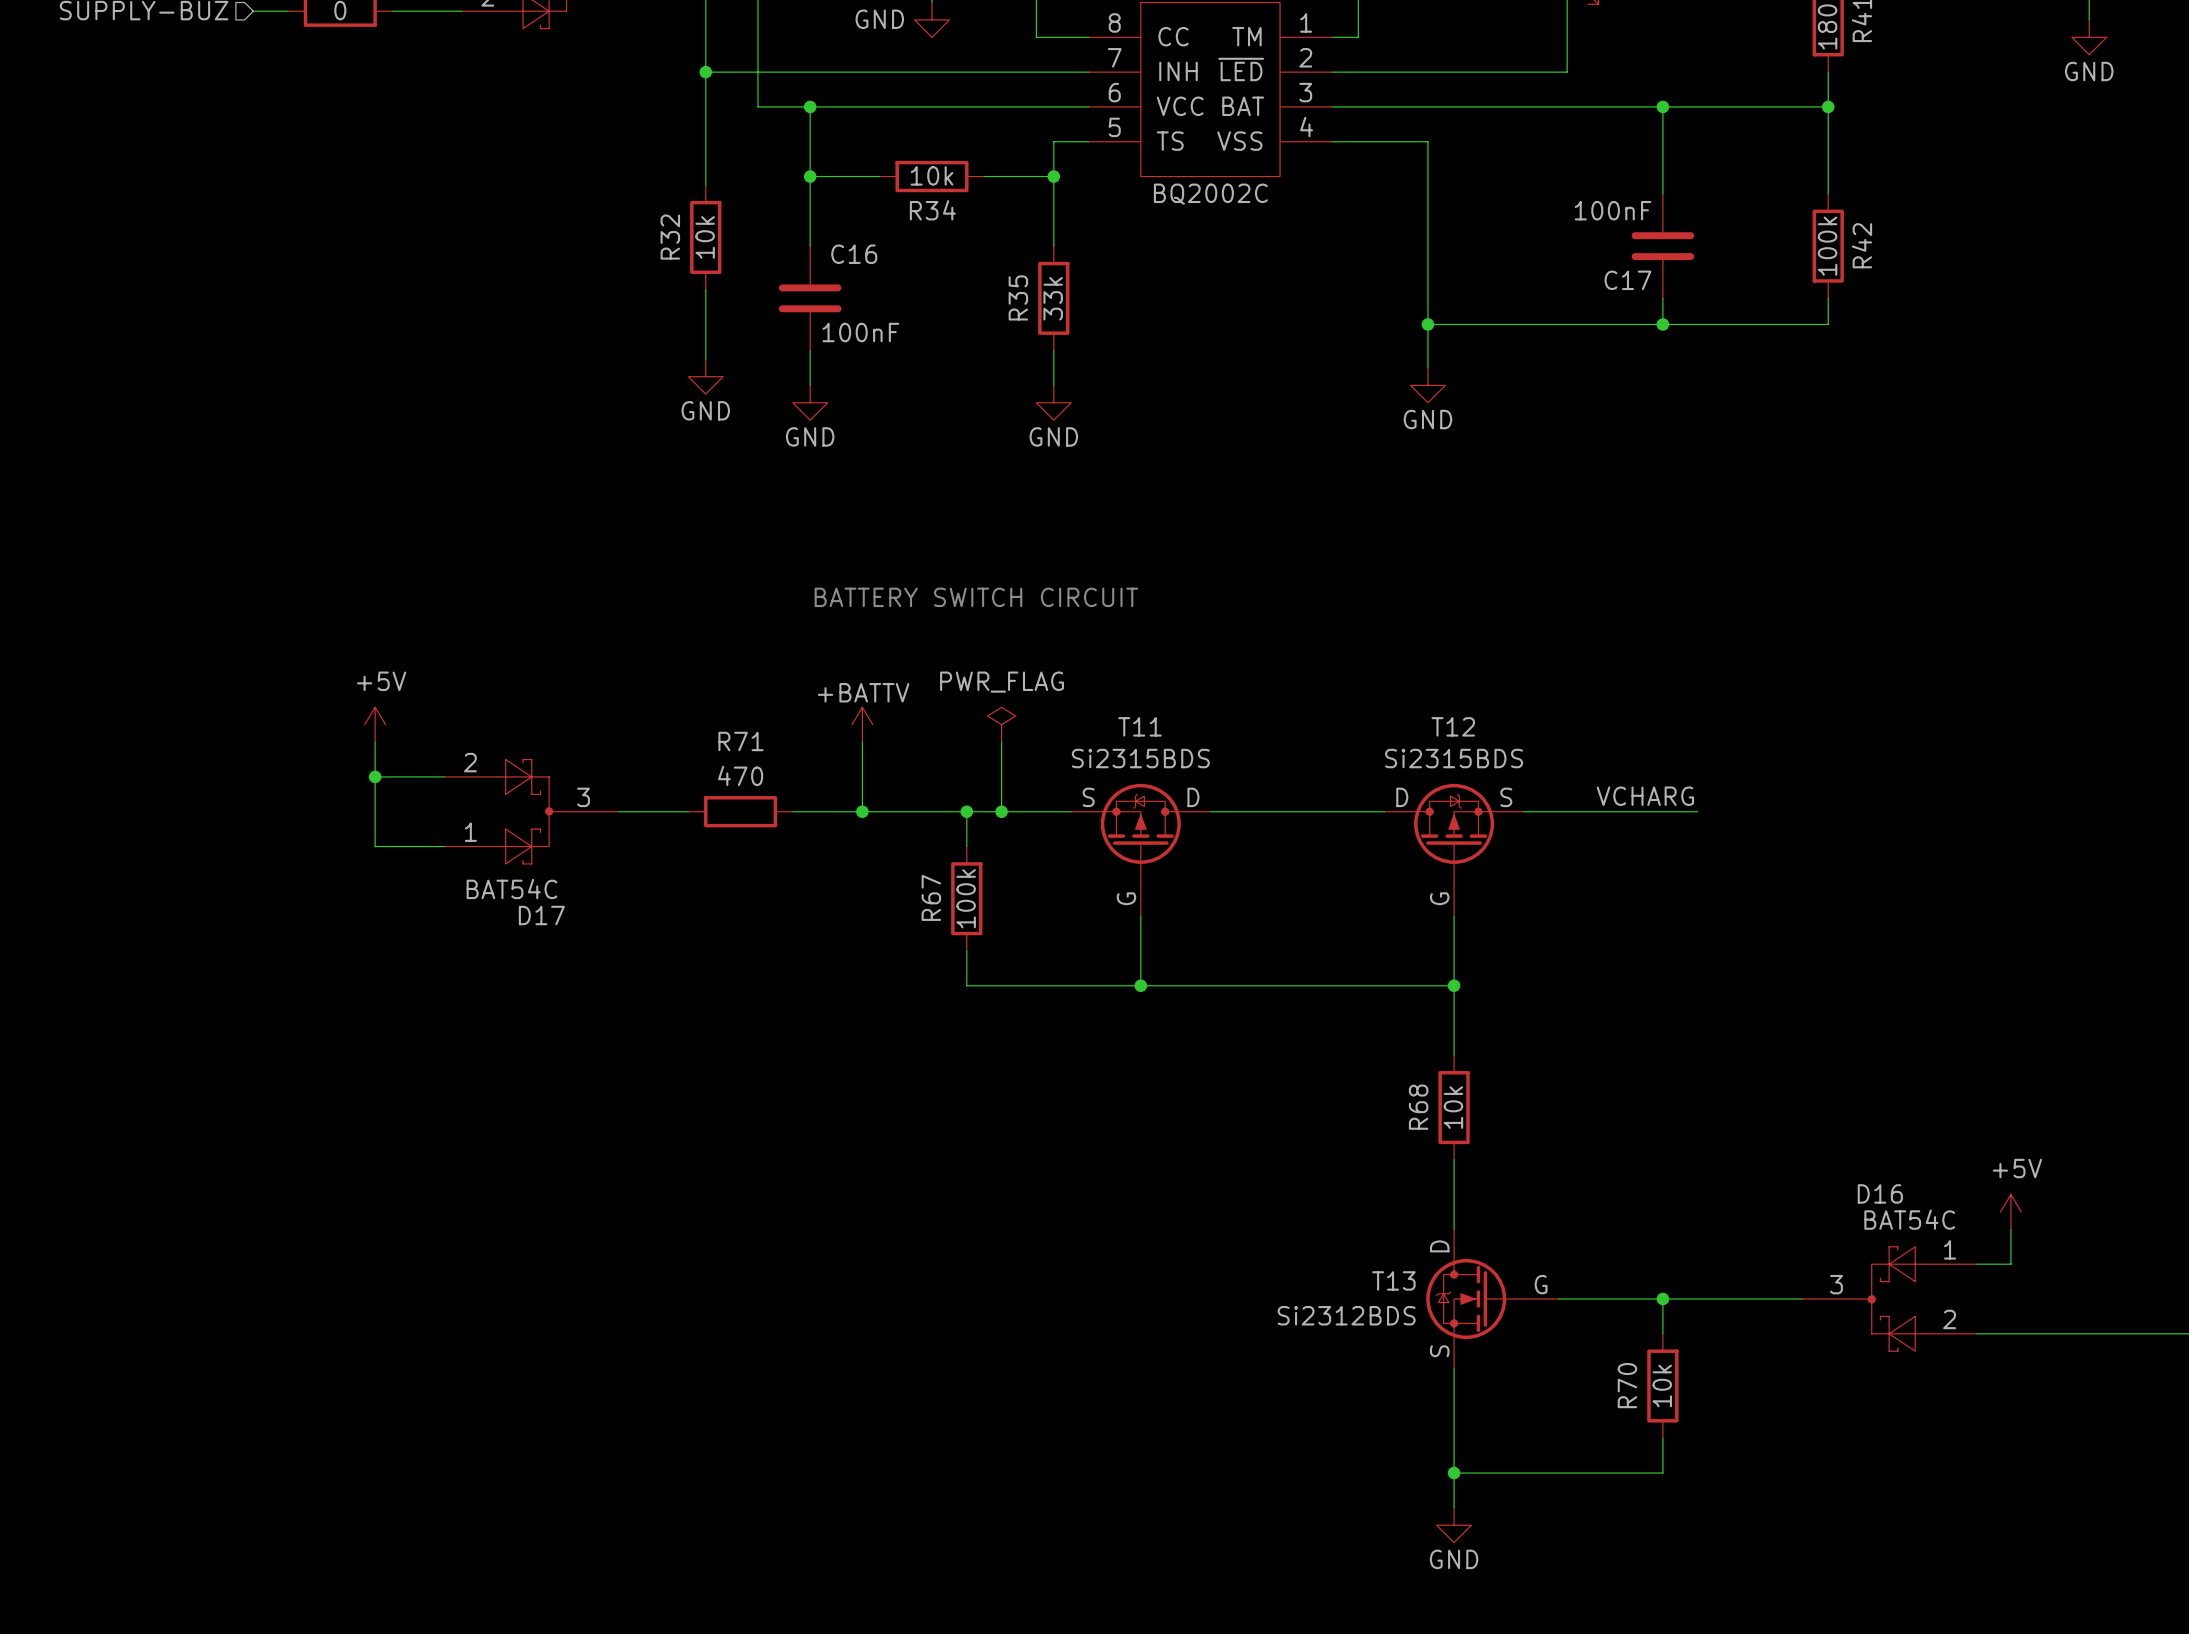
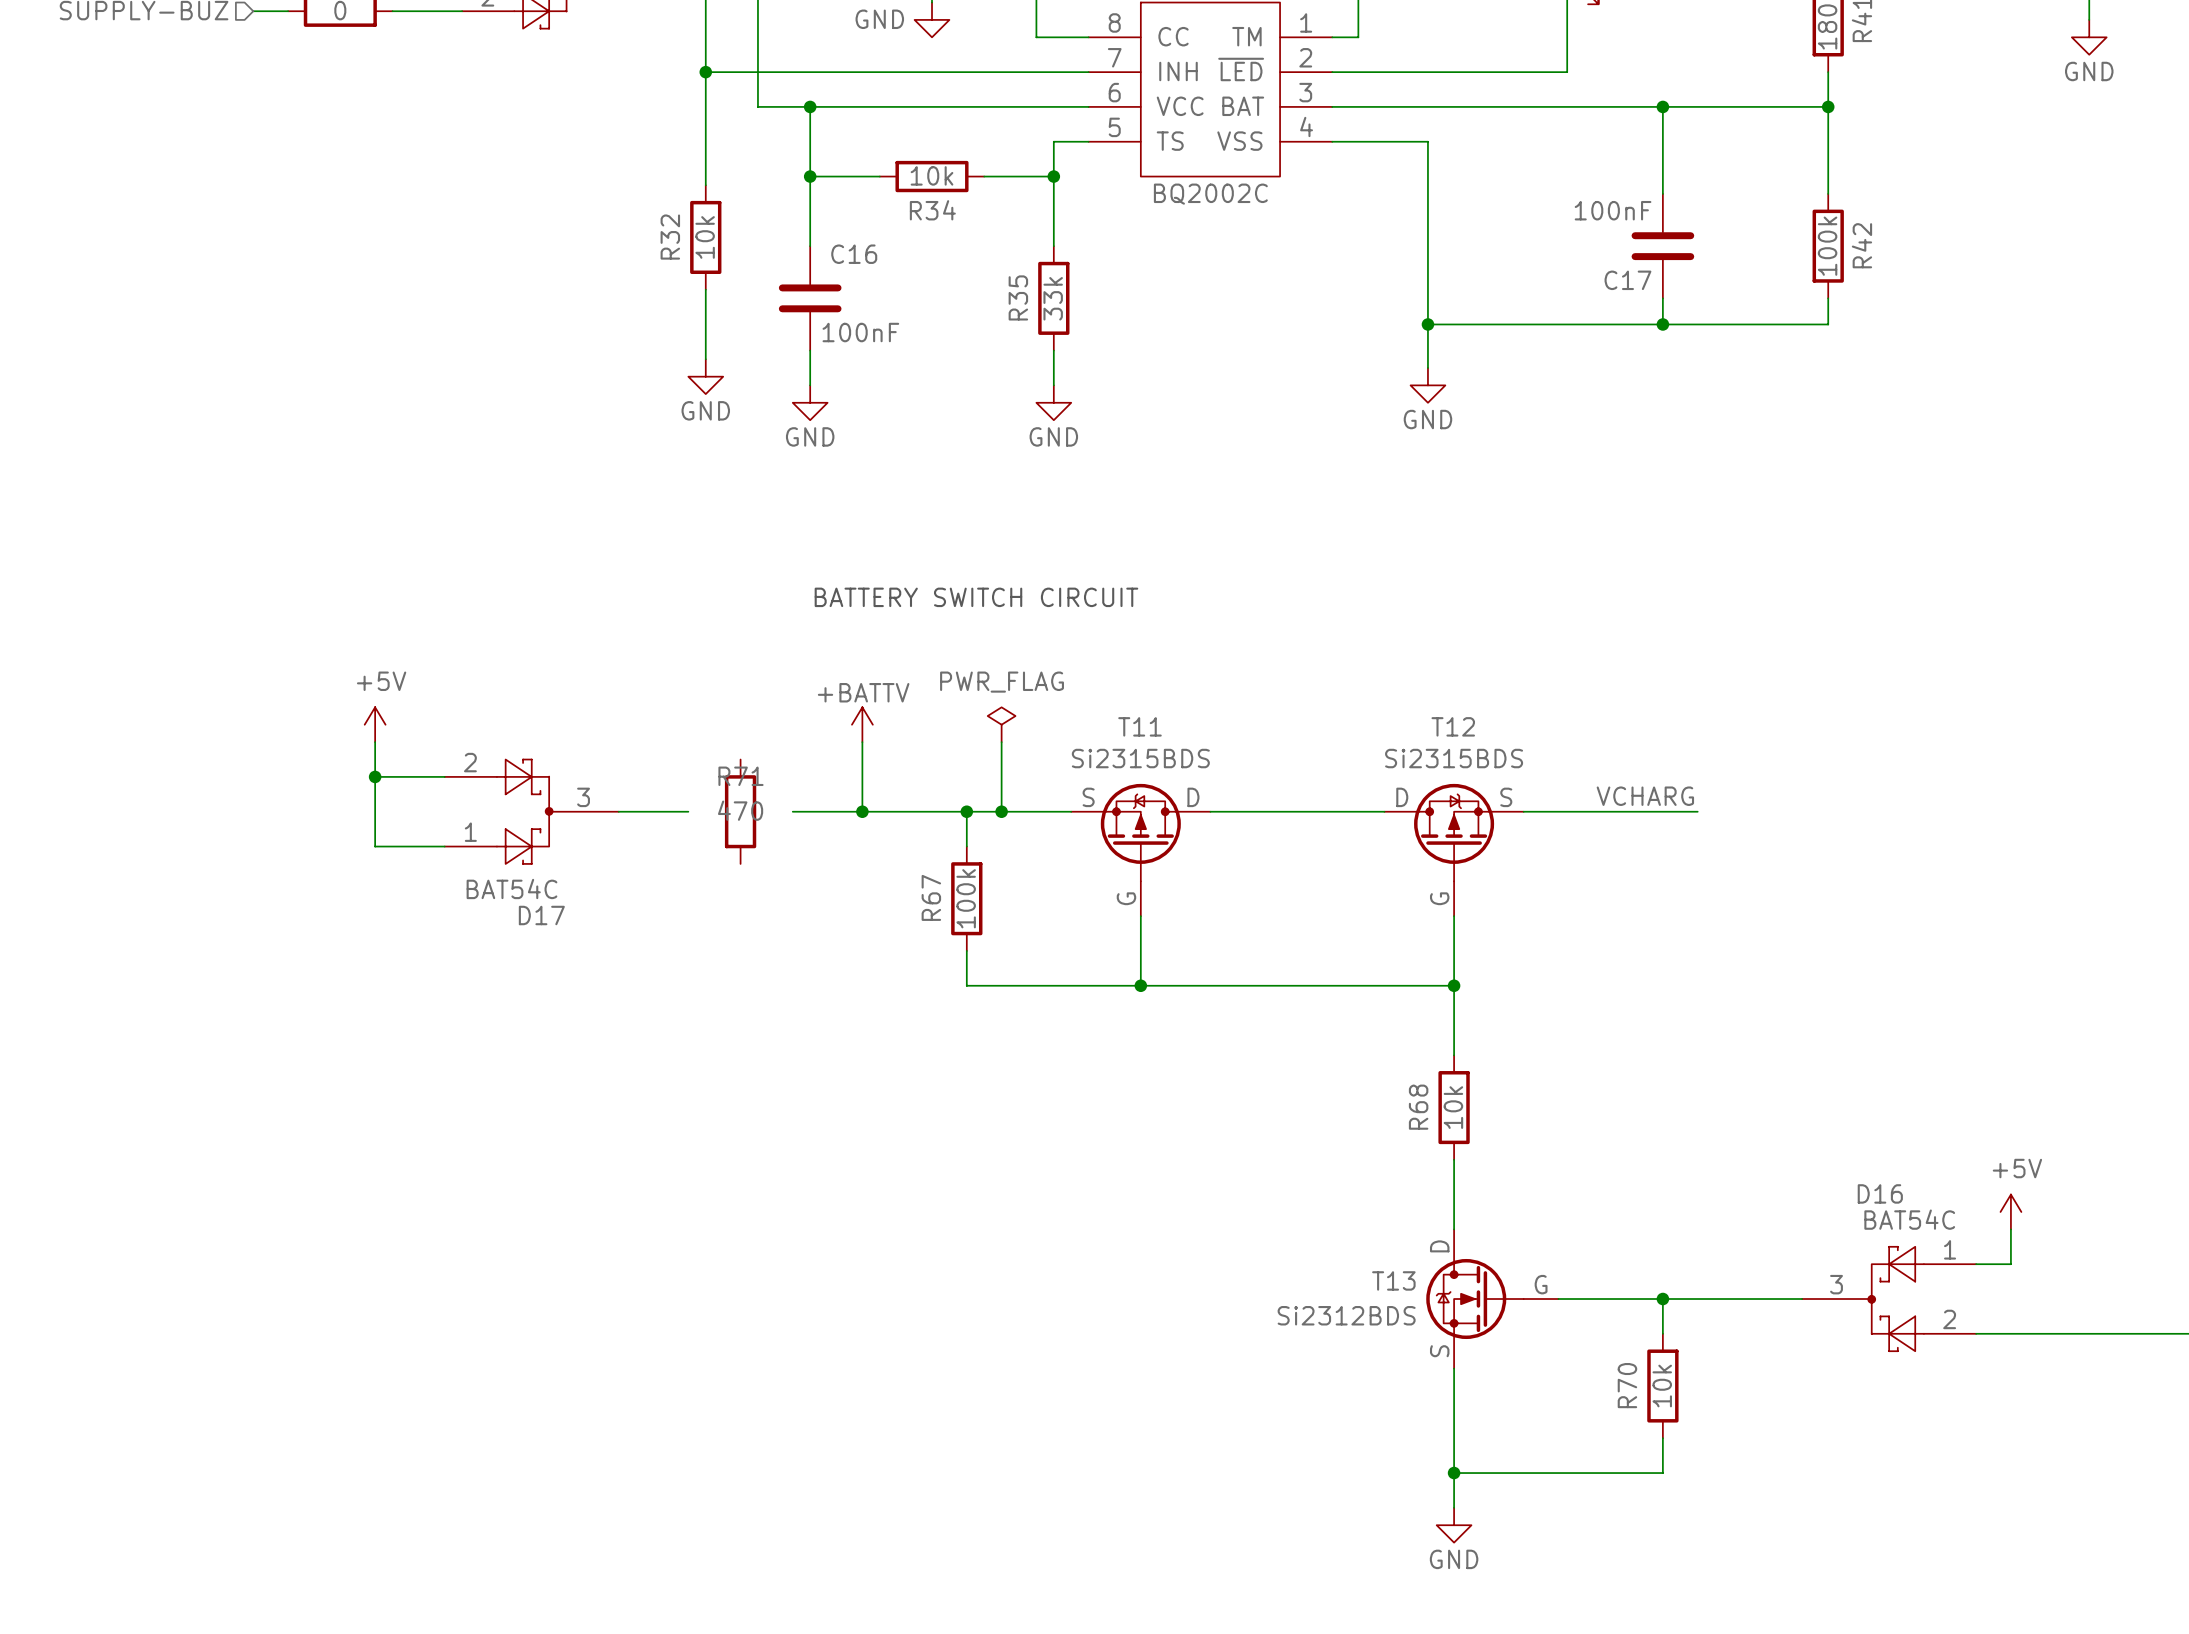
R71 name position: R71 (740, 741) -> R71 (740, 776)
R71 value position: 470 (740, 775) -> 470 (740, 810)
R71 rotation: 0° (740, 811) -> 90° clockwise (740, 811)

